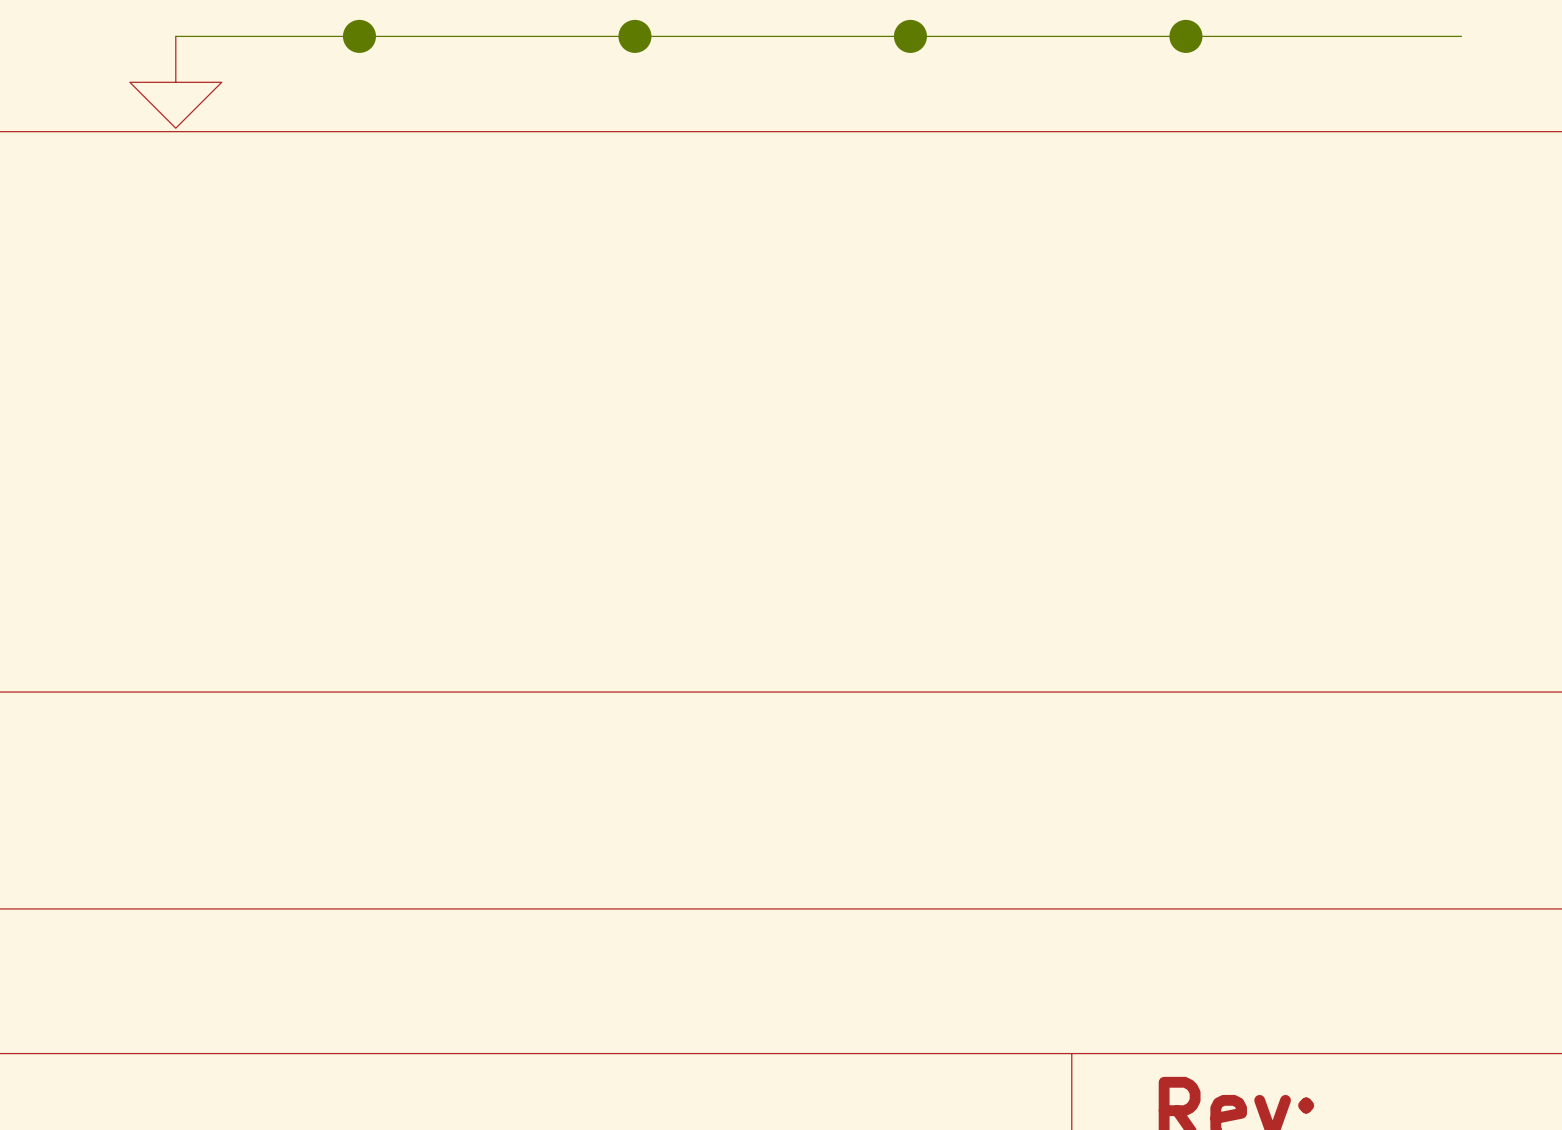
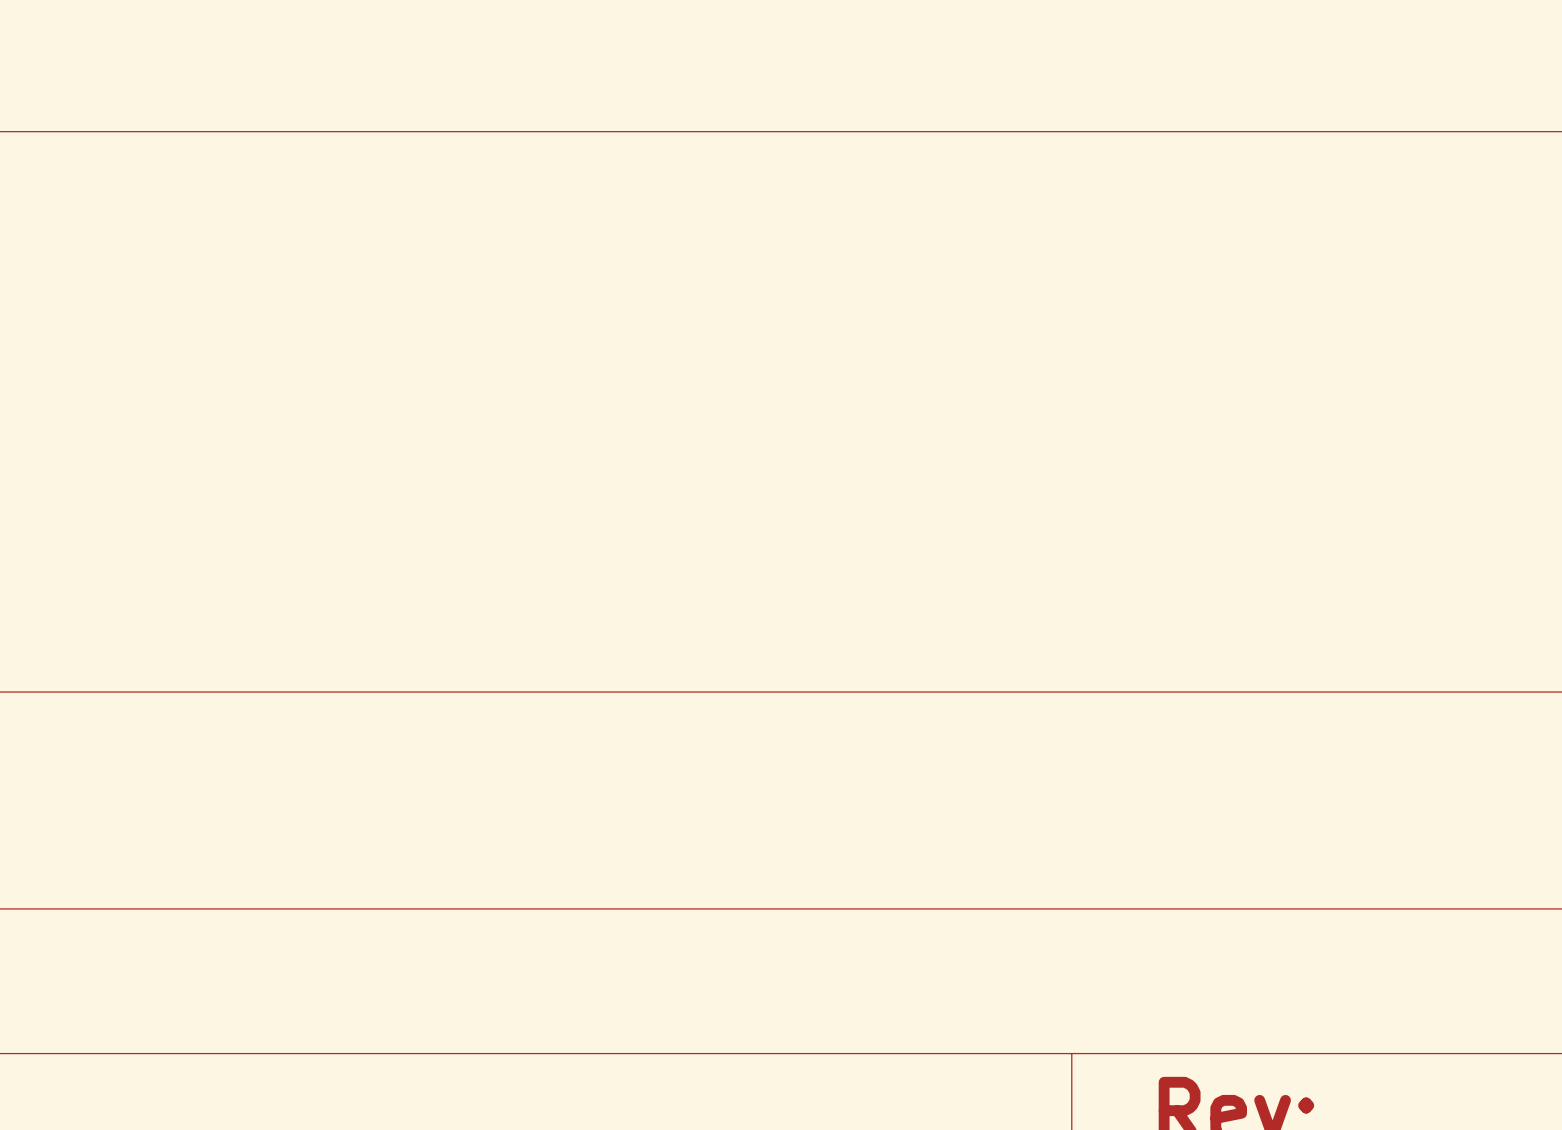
wire: (175, 36) (1461, 36) -> none
junction: (359, 36) -> none
junction: (634, 36) -> none
junction: (910, 36) -> none
junction: (1185, 36) -> none
power symbol: (175, 82) -> none

